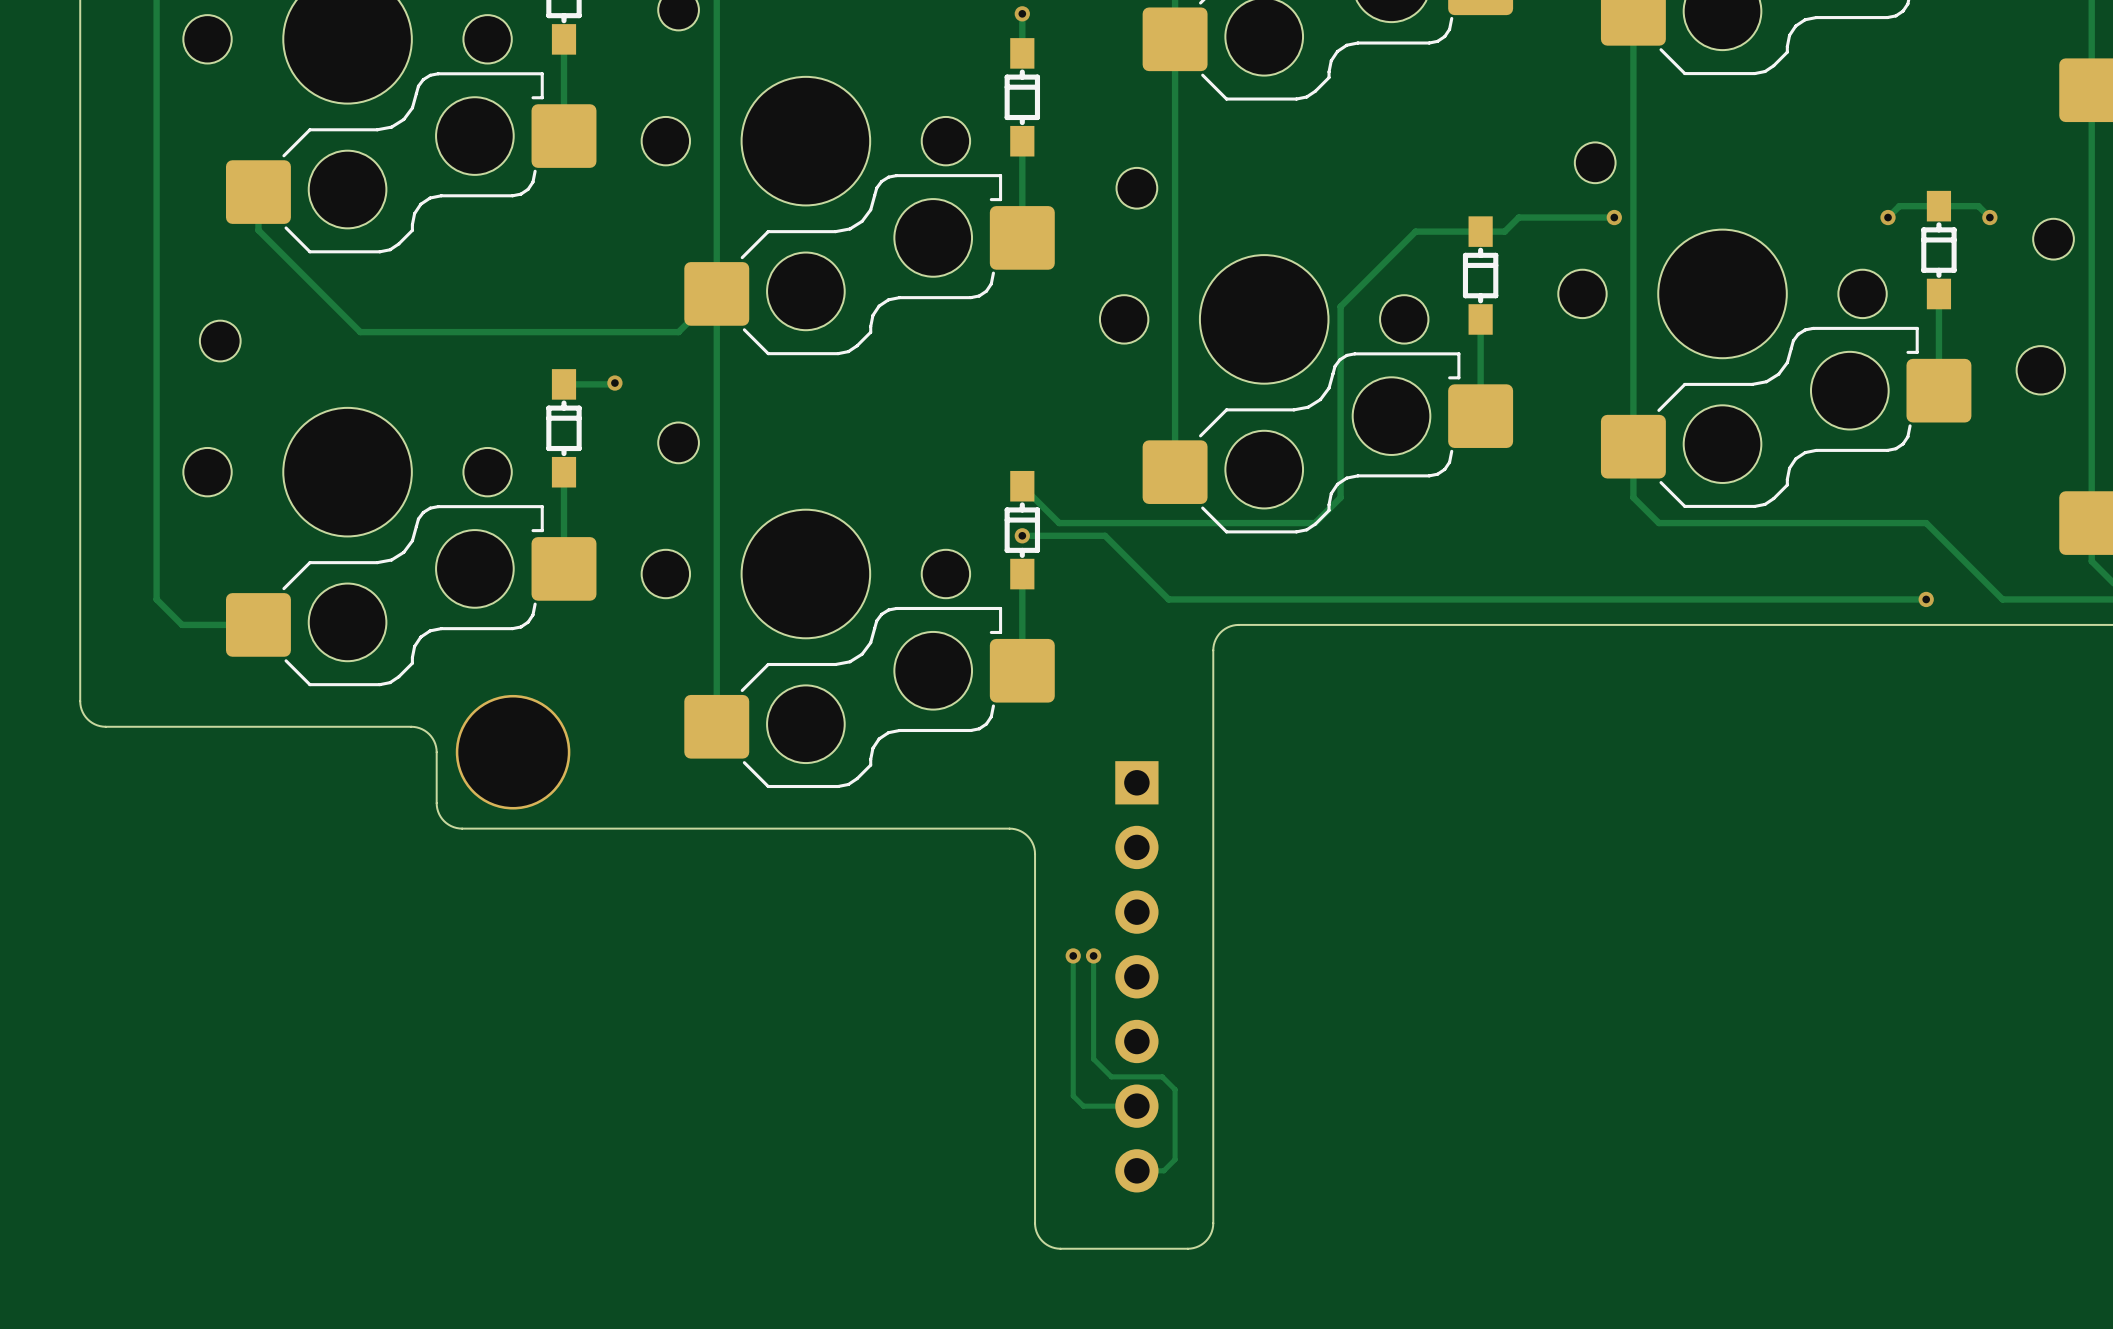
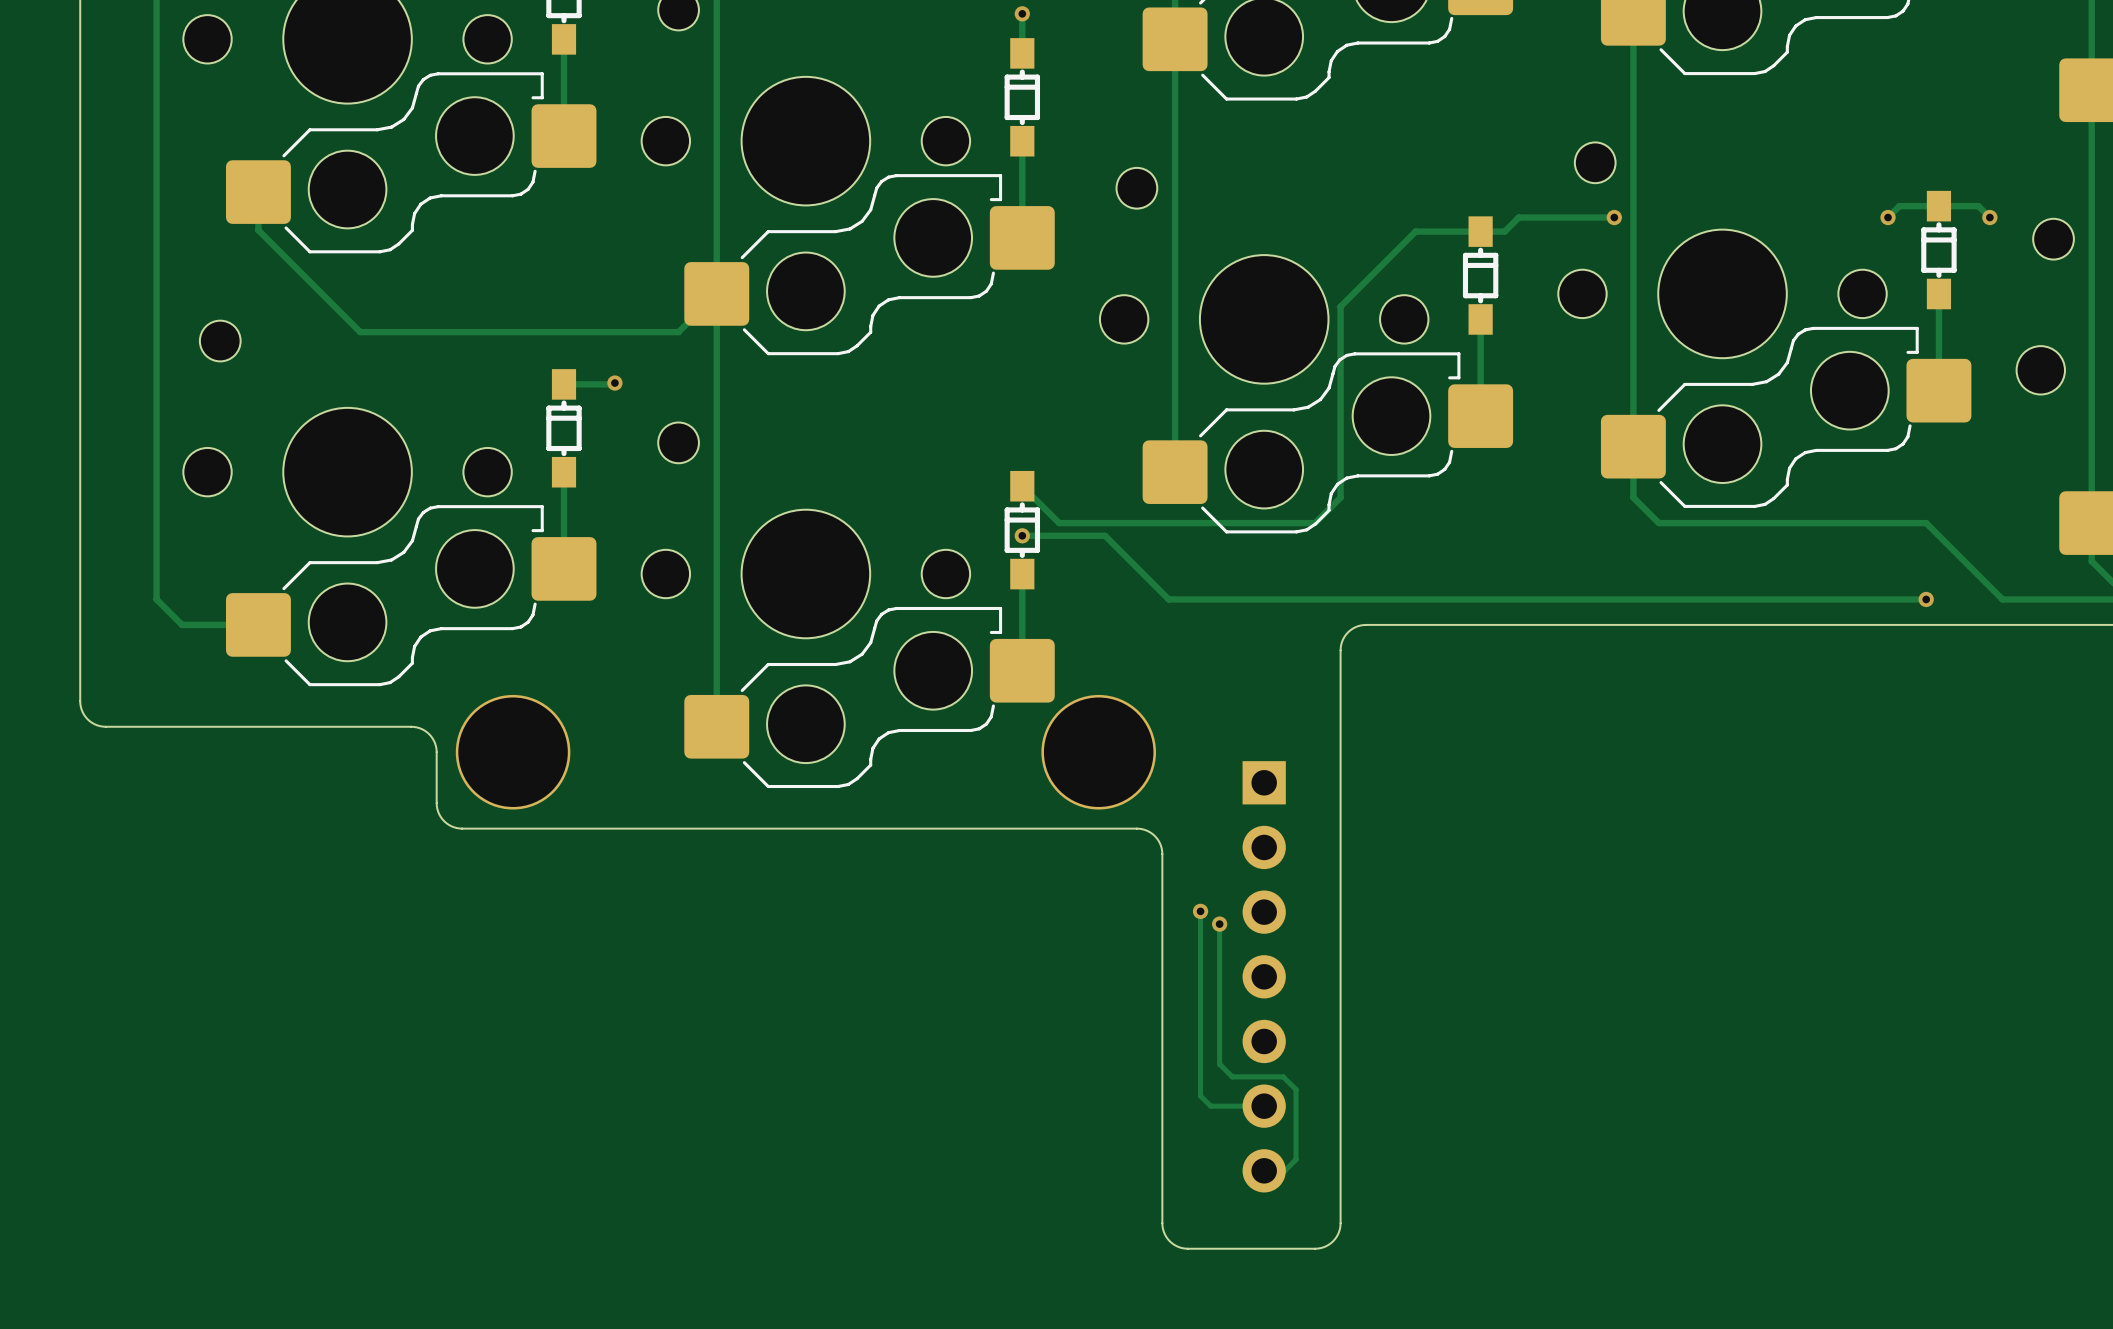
board edge: (1366, 624) (1235, 625) (1220, 632) (1213, 644) (1213, 1223) (1209, 1236) (1198, 1246) (1187, 1248) (1057, 1248) (1044, 1243) (1037, 1234) (1035, 1223) (1034, 851) (1027, 836) (1020, 831) (1009, 828) -> (1366, 624) (1357, 626) (1348, 632) (1340, 647) (1340, 1223) (1338, 1234) (1328, 1244) (1315, 1248) (1187, 1248) (1176, 1246) (1167, 1239) (1162, 1223) (1160, 845) (1152, 834) (1139, 828) (1009, 828)
part: none -> (1098, 752)
track: none -> (1200, 911) (1200, 1095) (1210, 1106) (1264, 1106)
via: none -> (1200, 911)
track: none -> (1219, 924) (1219, 1064) (1232, 1076) (1283, 1076) (1296, 1089) (1296, 1159) (1284, 1170) (1264, 1170)
via: none -> (1219, 924)
track: (1073, 955) (1073, 1095) (1083, 1106) (1136, 1106) -> none
via: (1073, 955) -> none
track: (1093, 955) (1093, 1059) (1111, 1076) (1162, 1076) (1175, 1089) (1175, 1159) (1163, 1170) (1136, 1170) -> none
via: (1093, 955) -> none
part position: (1136, 976) -> (1264, 976)

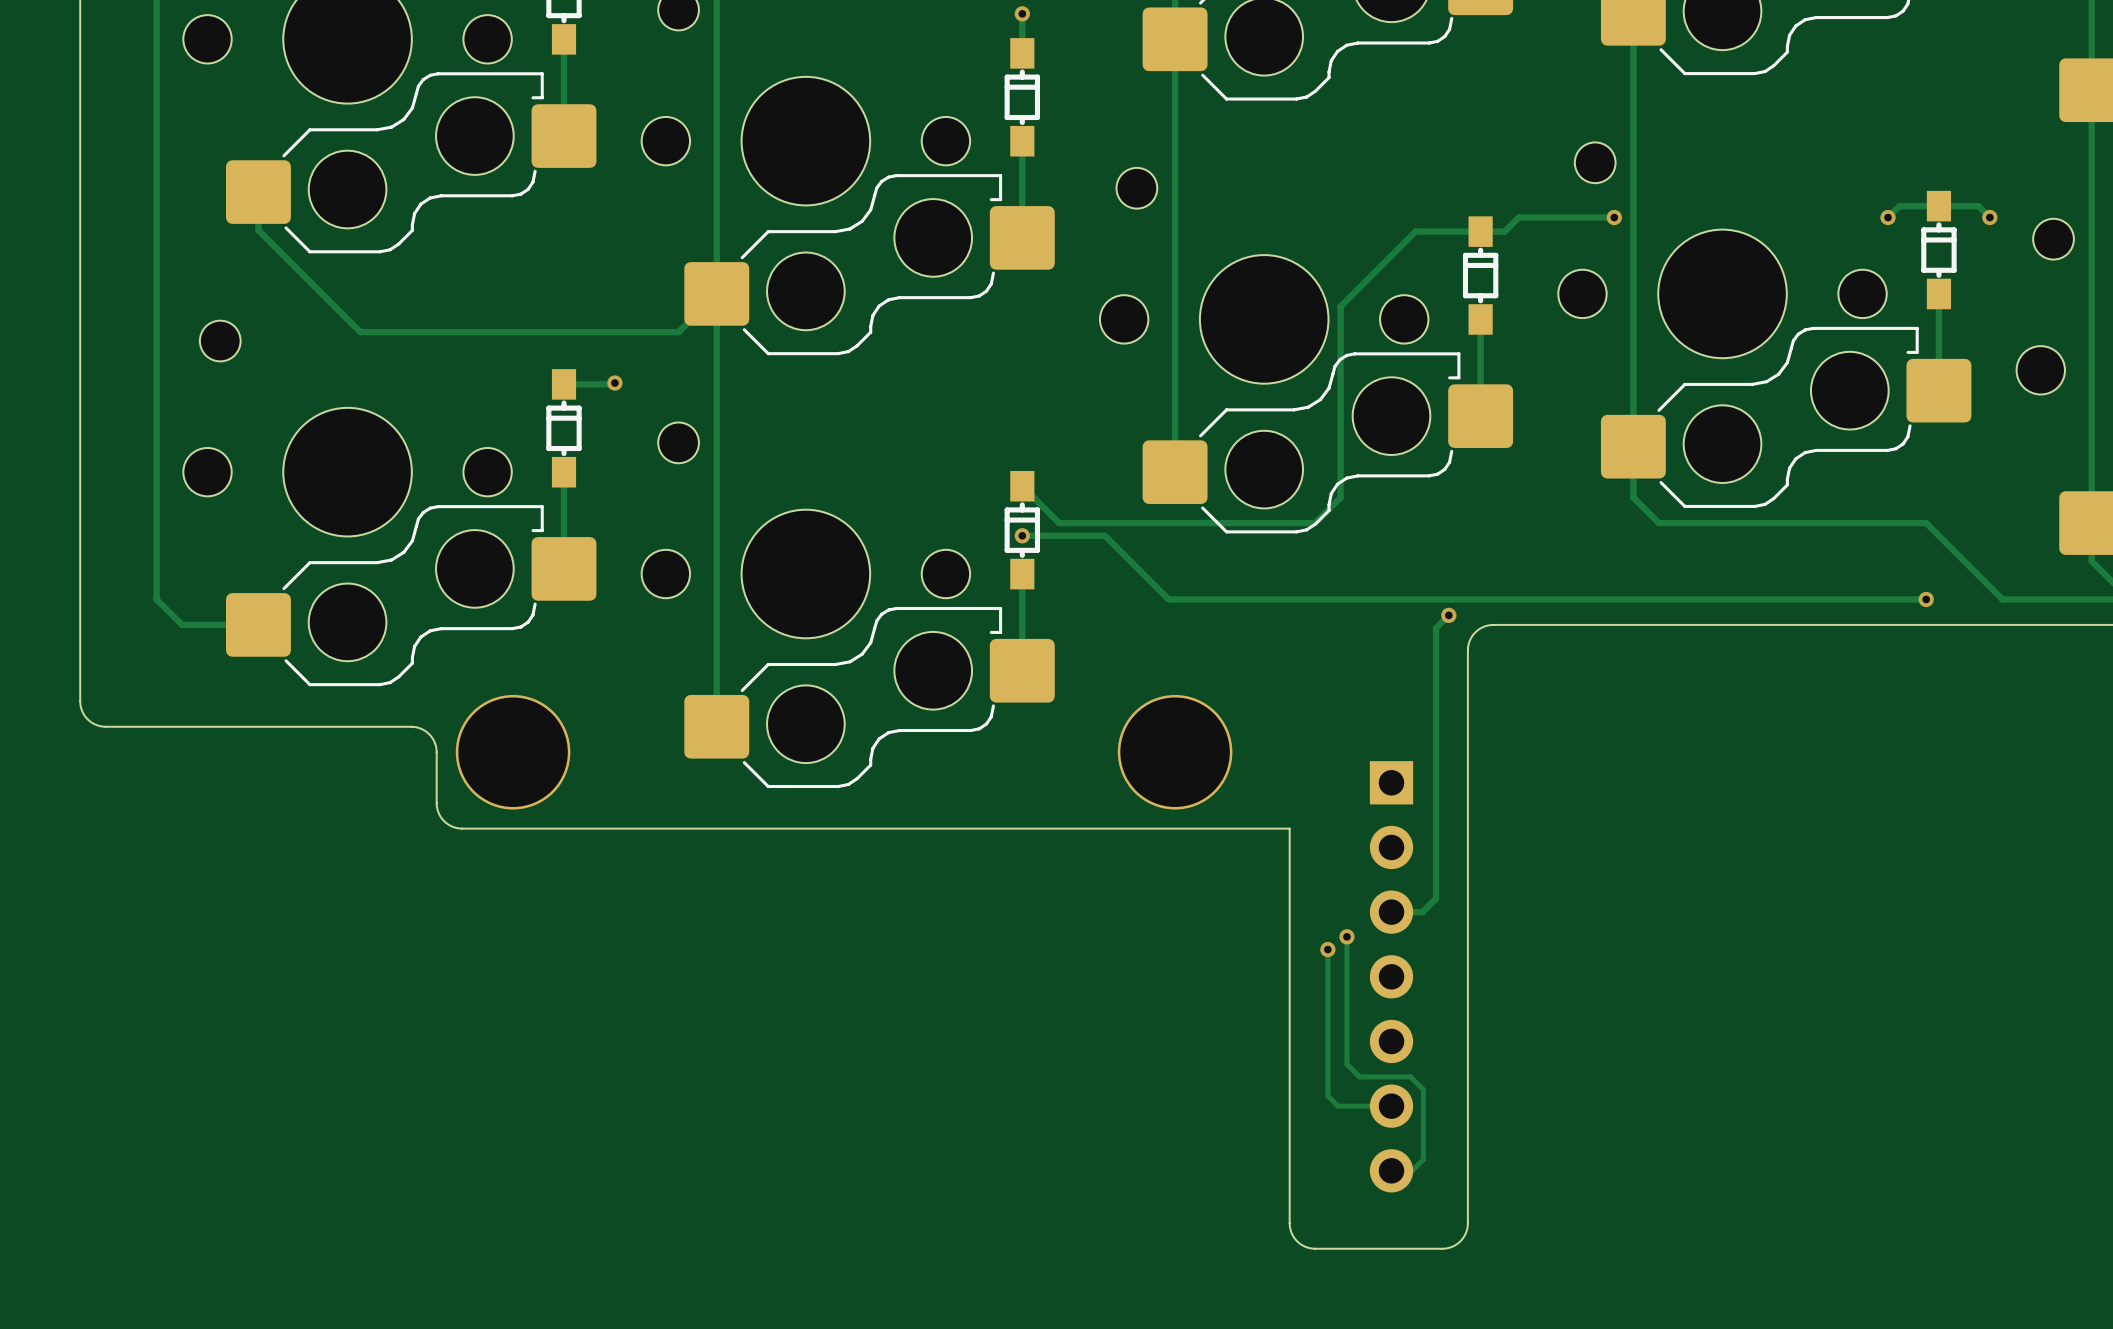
track: none -> (1448, 615) (1436, 628) (1436, 898) (1422, 912) (1391, 912)
via: none -> (1448, 615)
board edge: (1493, 624) (1363, 625) (1348, 632) (1341, 644) (1340, 1223) (1336, 1236) (1326, 1246) (1315, 1248) (1184, 1248) (1171, 1243) (1164, 1234) (1162, 1223) (1162, 851) (1158, 840) (1152, 834) (1136, 828) -> (1493, 624) (1482, 627) (1475, 632) (1468, 647) (1467, 1223) (1465, 1234) (1455, 1244) (1442, 1248) (1315, 1248) (1304, 1246) (1295, 1239) (1289, 1223) (1289, 828) (1136, 828)
part position: (1098, 752) -> (1175, 752)
track: (1200, 911) (1200, 1095) (1210, 1106) (1264, 1106) -> none
via: (1200, 911) -> none
track: (1219, 924) (1219, 1064) (1232, 1076) (1283, 1076) (1296, 1089) (1296, 1159) (1284, 1170) (1264, 1170) -> none
via: (1219, 924) -> none
track: none -> (1346, 936) (1346, 1064) (1359, 1076) (1410, 1076) (1423, 1089) (1423, 1159) (1412, 1170) (1391, 1170)
via: none -> (1346, 936)
track: none -> (1327, 949) (1327, 1095) (1338, 1106) (1391, 1106)
via: none -> (1327, 949)
part position: (1264, 976) -> (1391, 976)

